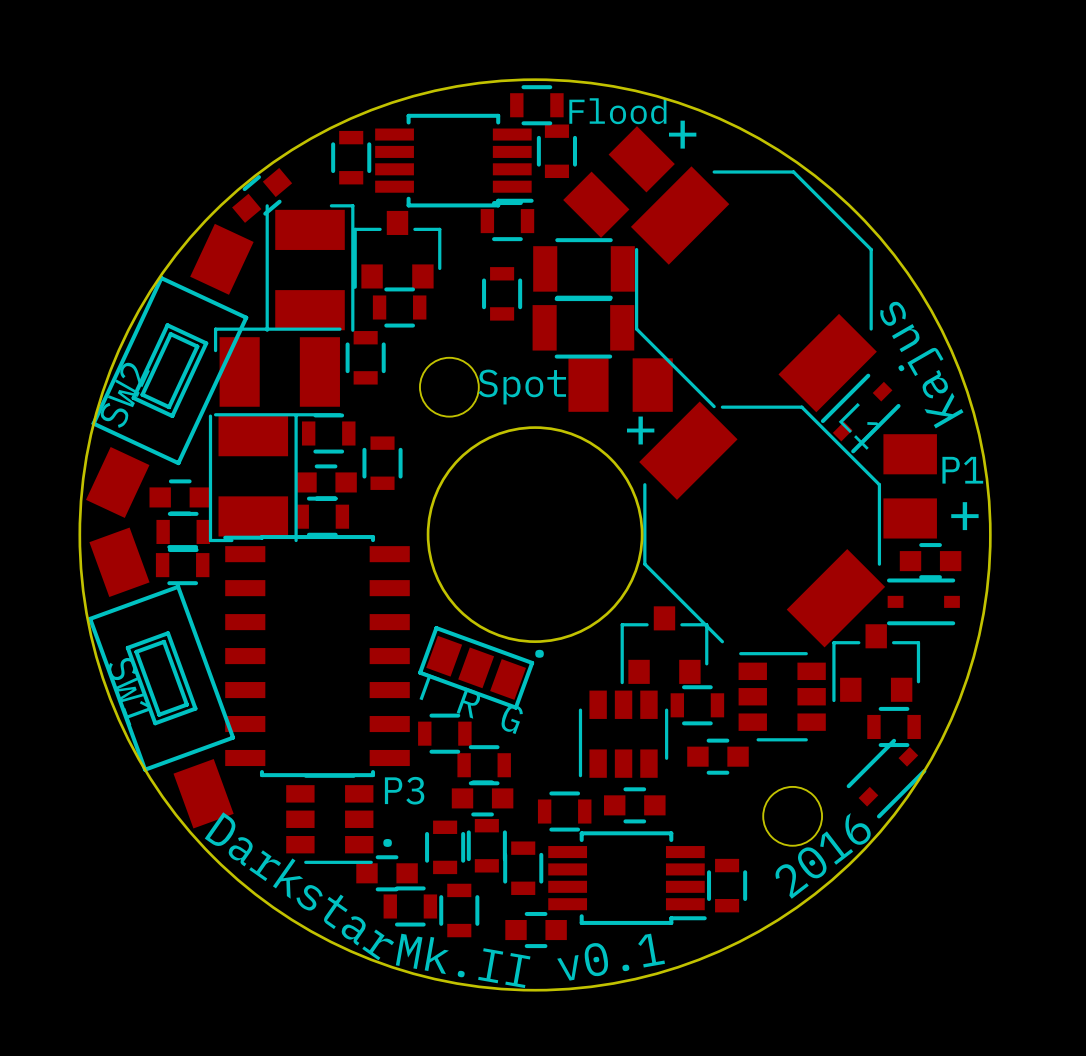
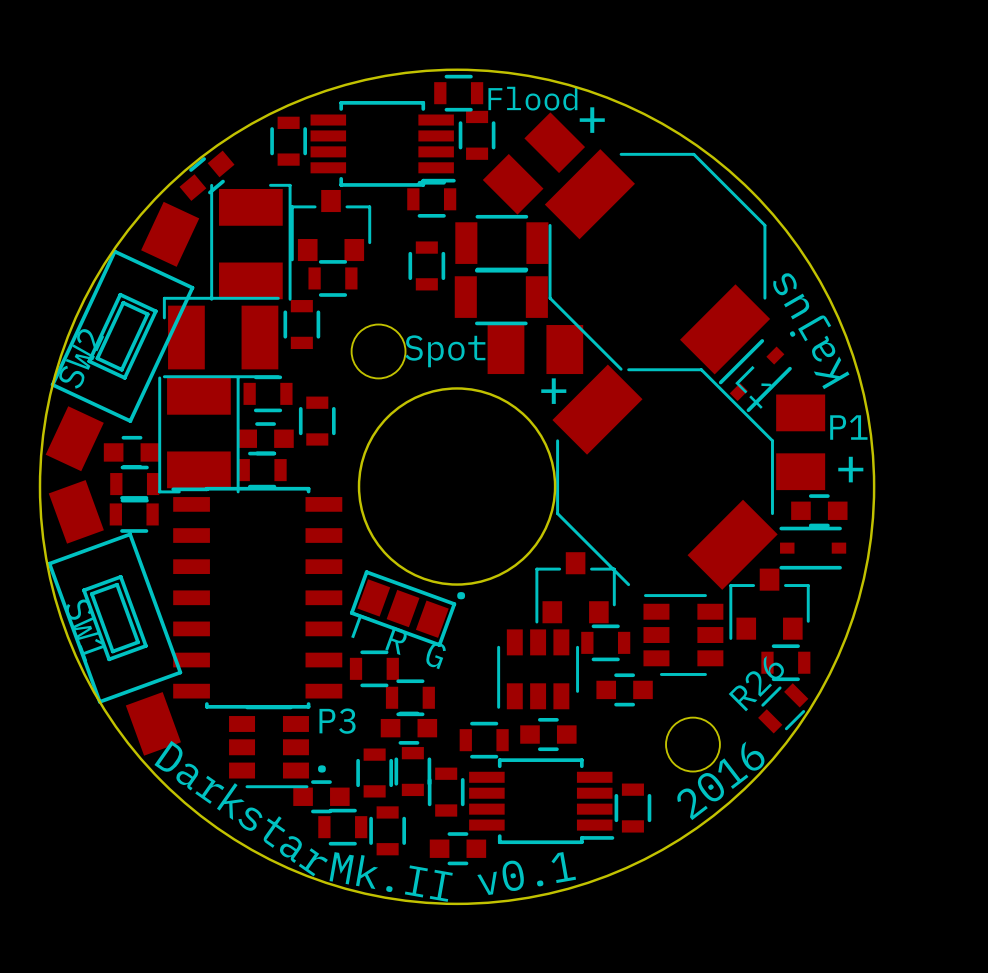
R26: none -> (783, 708)
part: (886, 778) -> none

